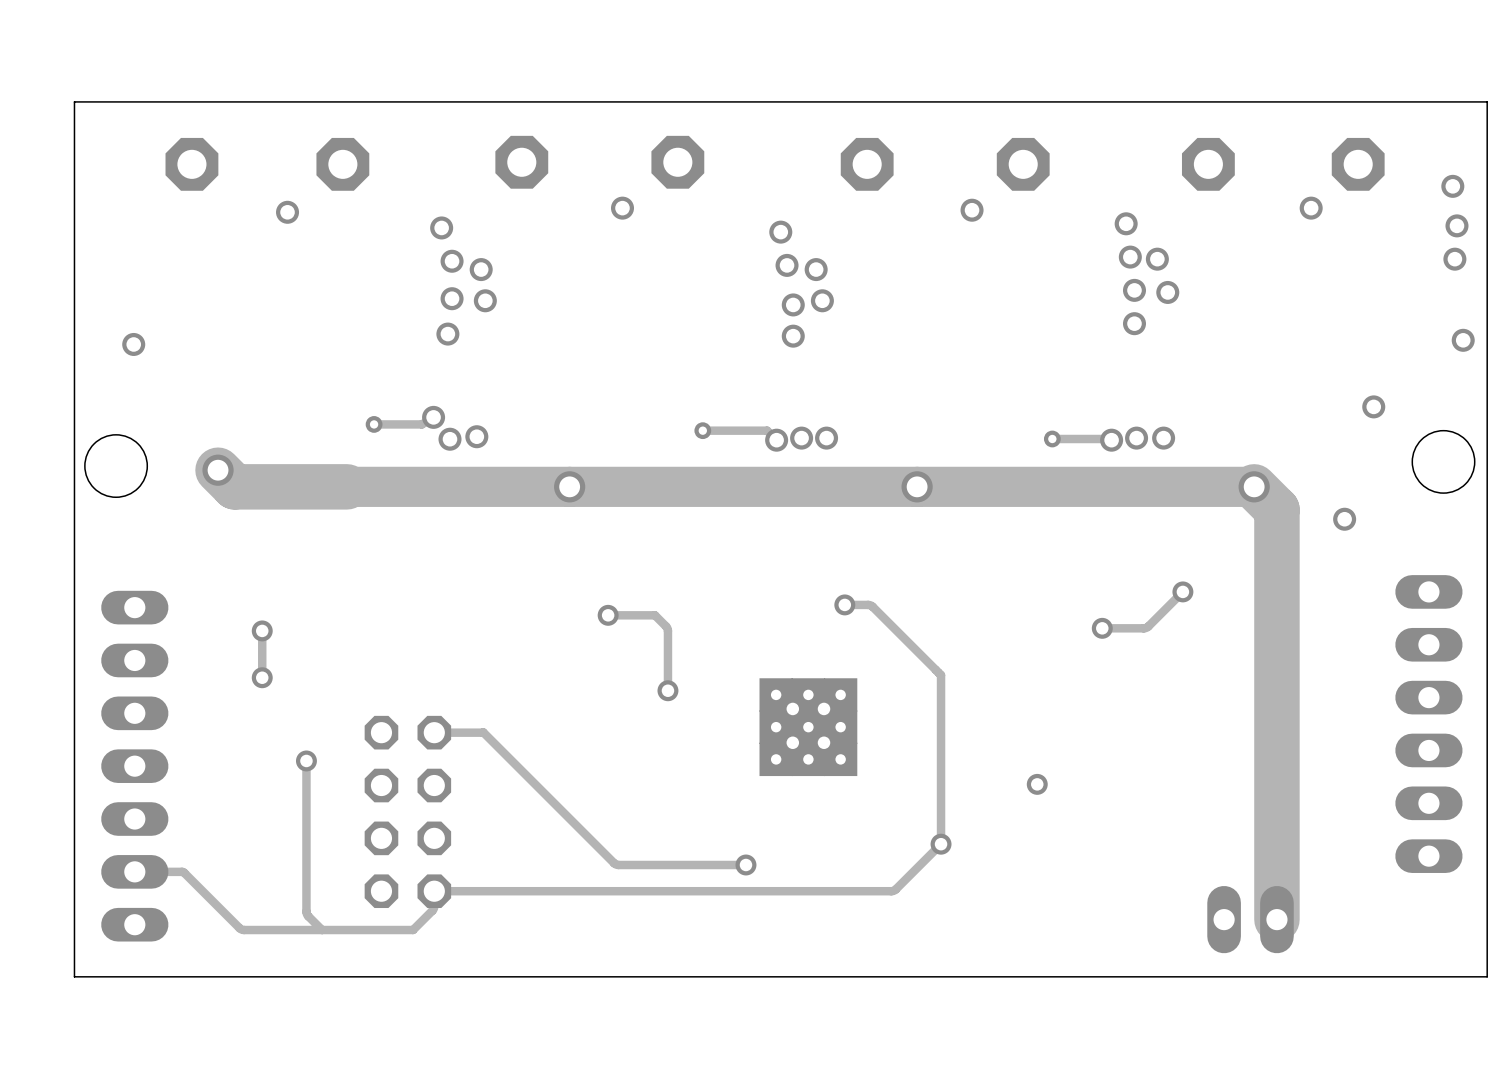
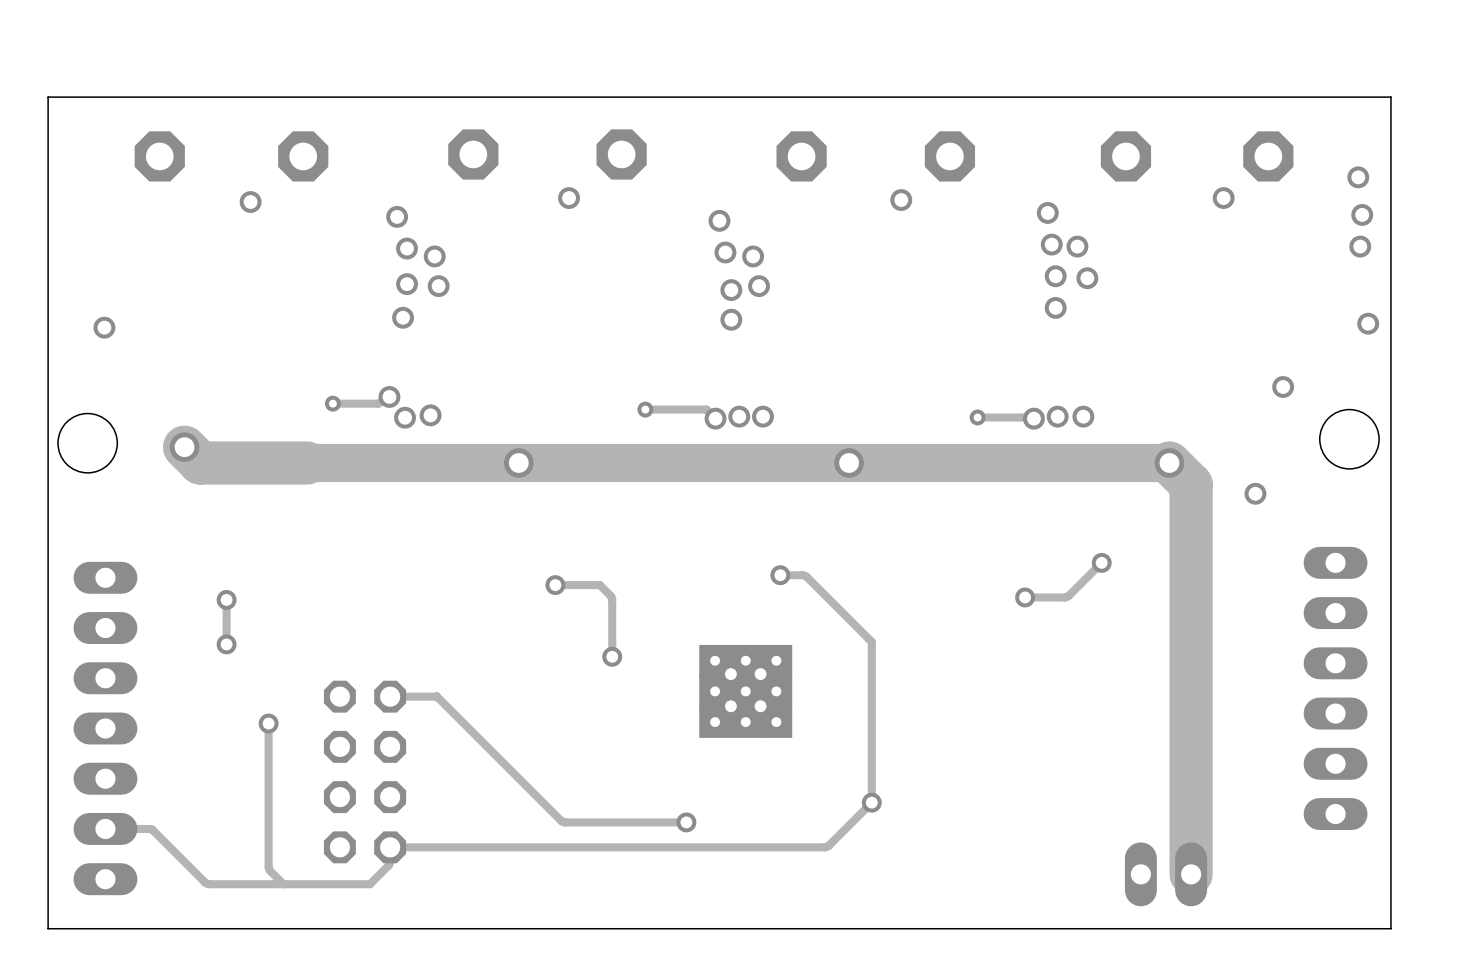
via: (1037, 784) -> none

